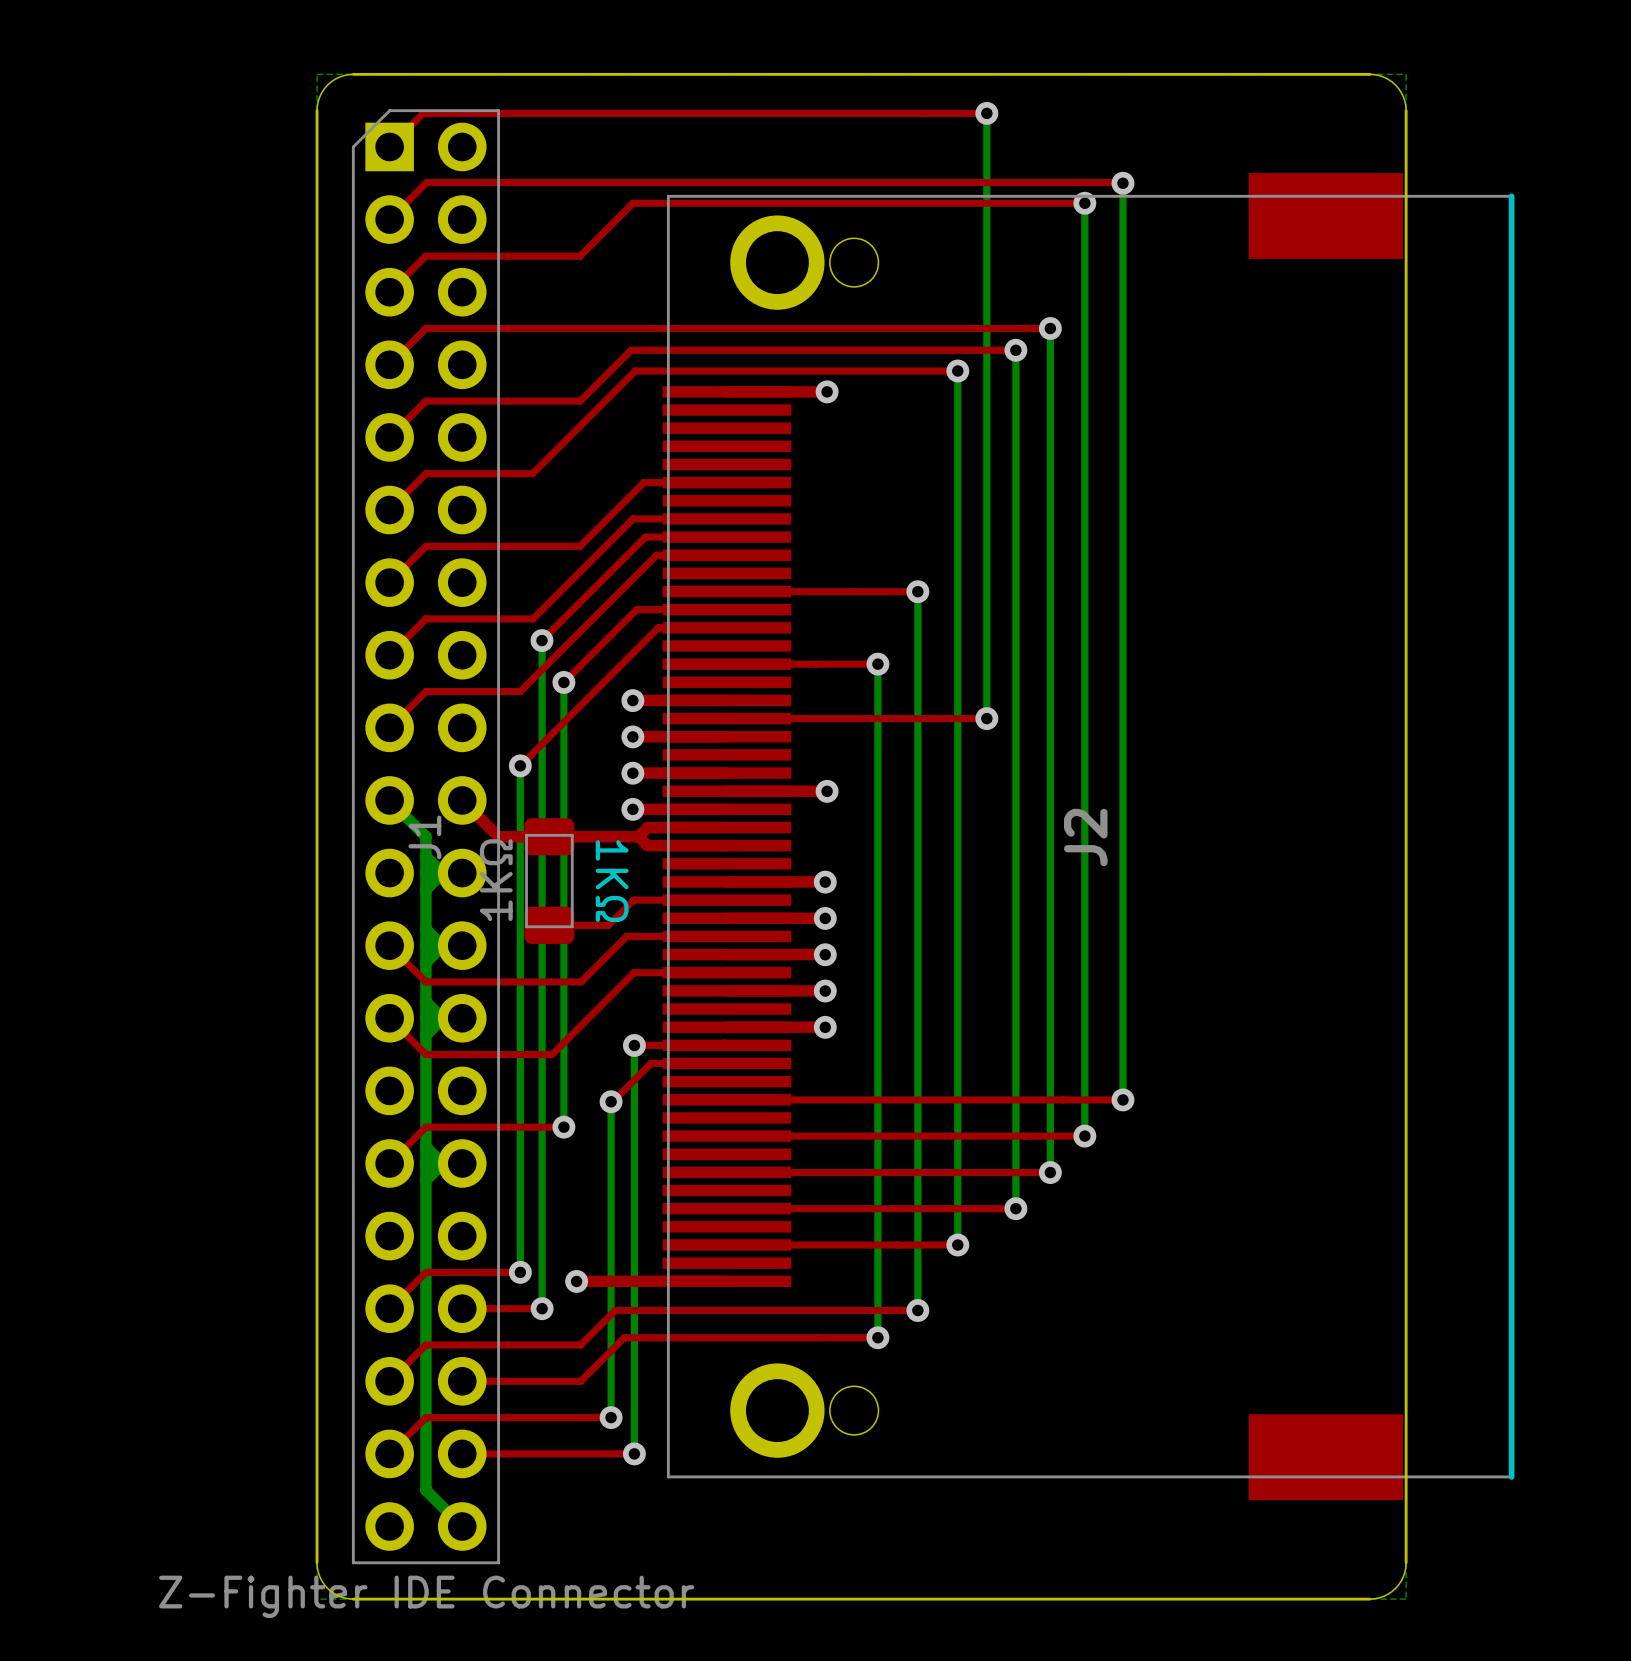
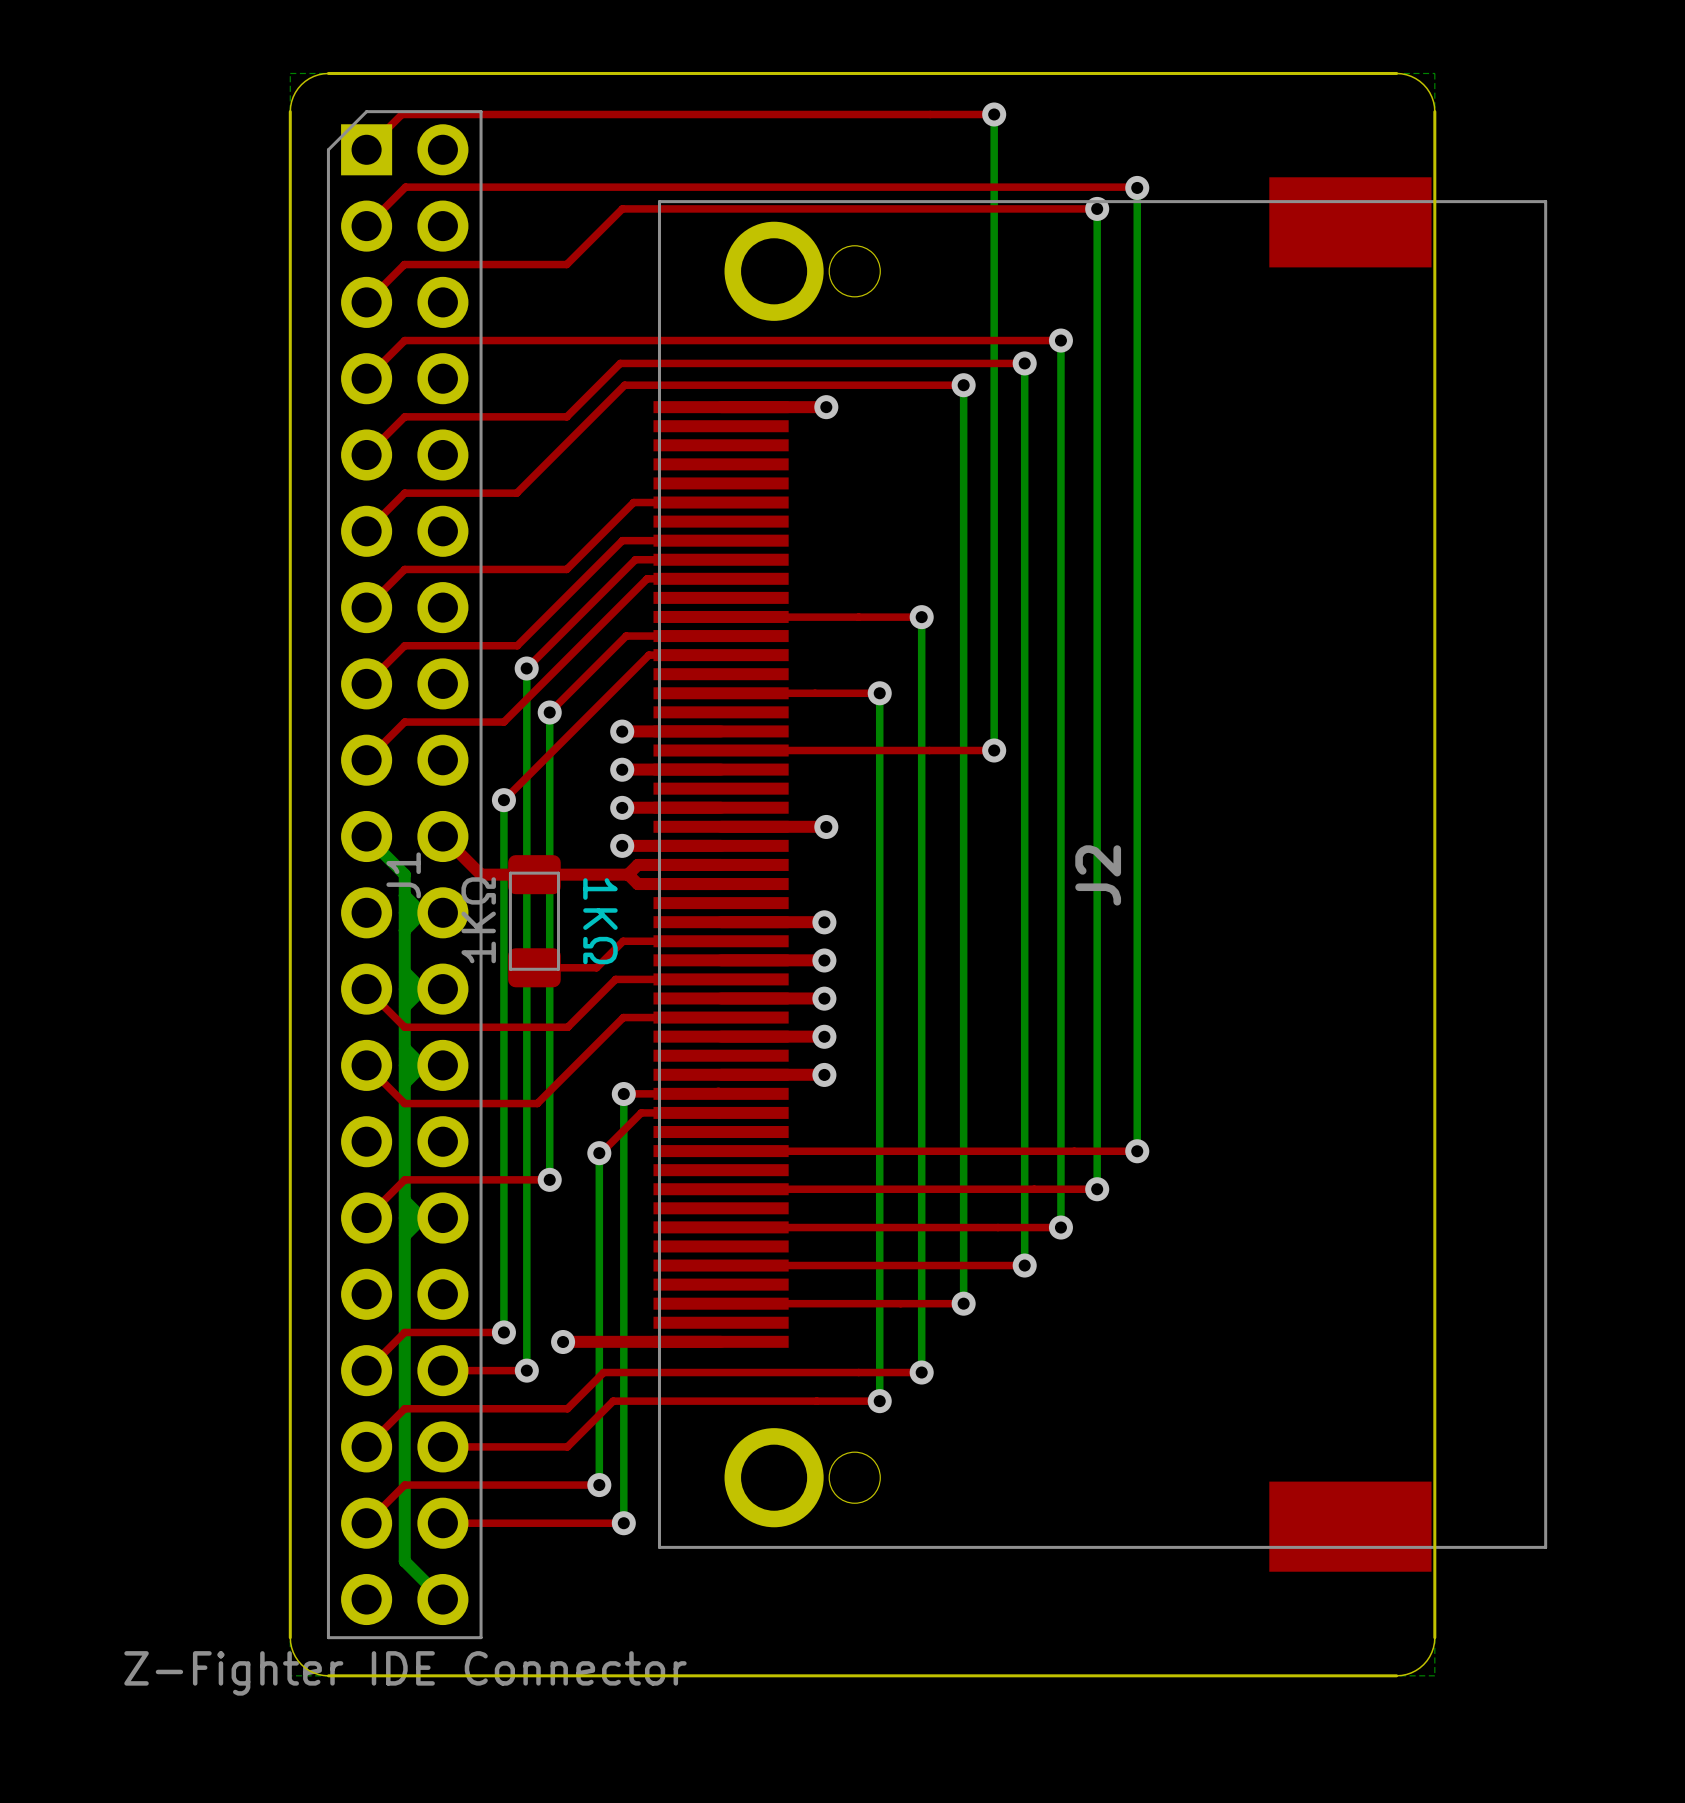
J2 footprint: [662, 173, 1515, 1501] -> [653, 177, 1548, 1572]

